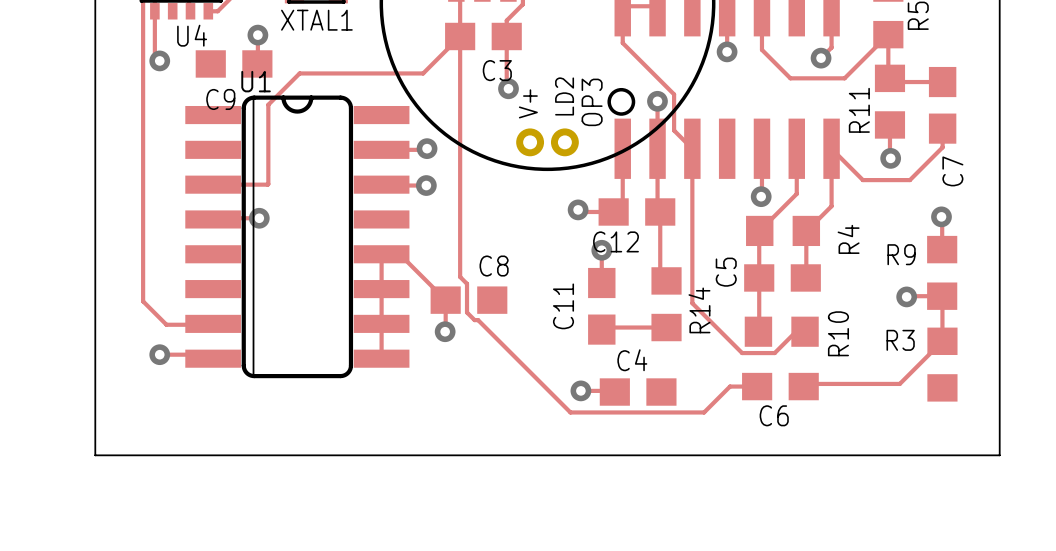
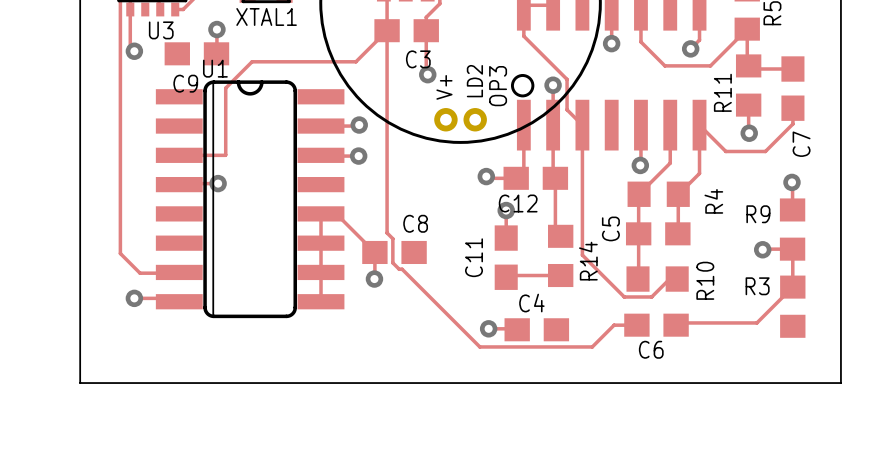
U4 name: U4 (192, 35) -> U3 (161, 30)

